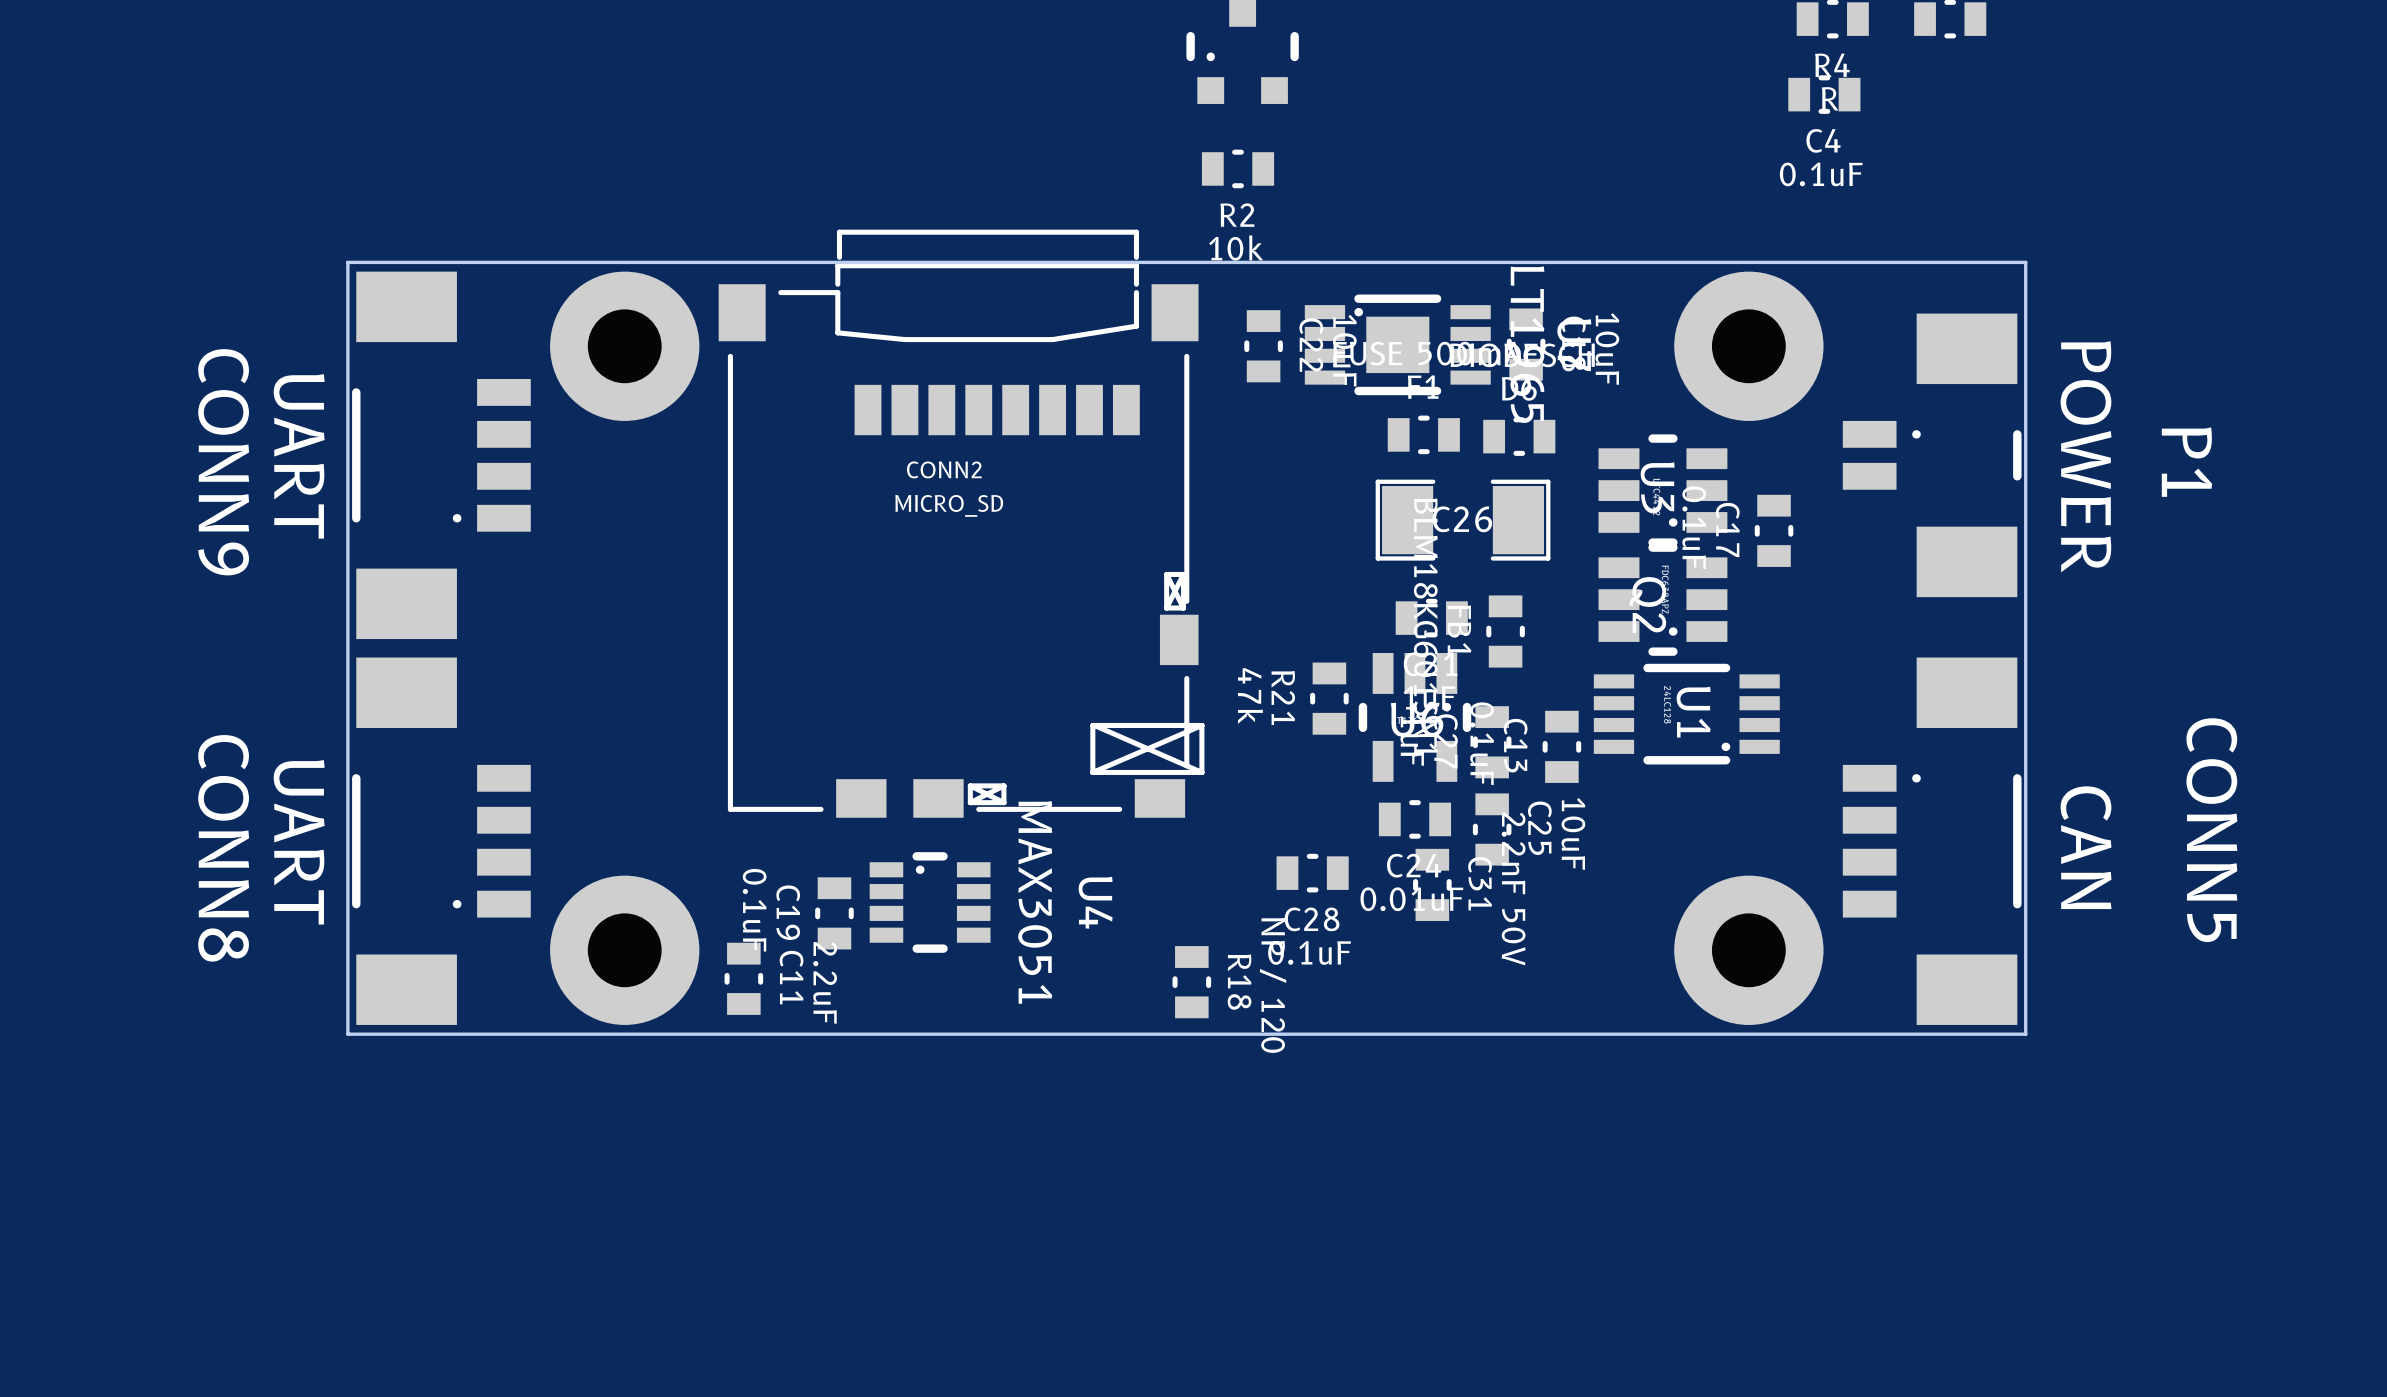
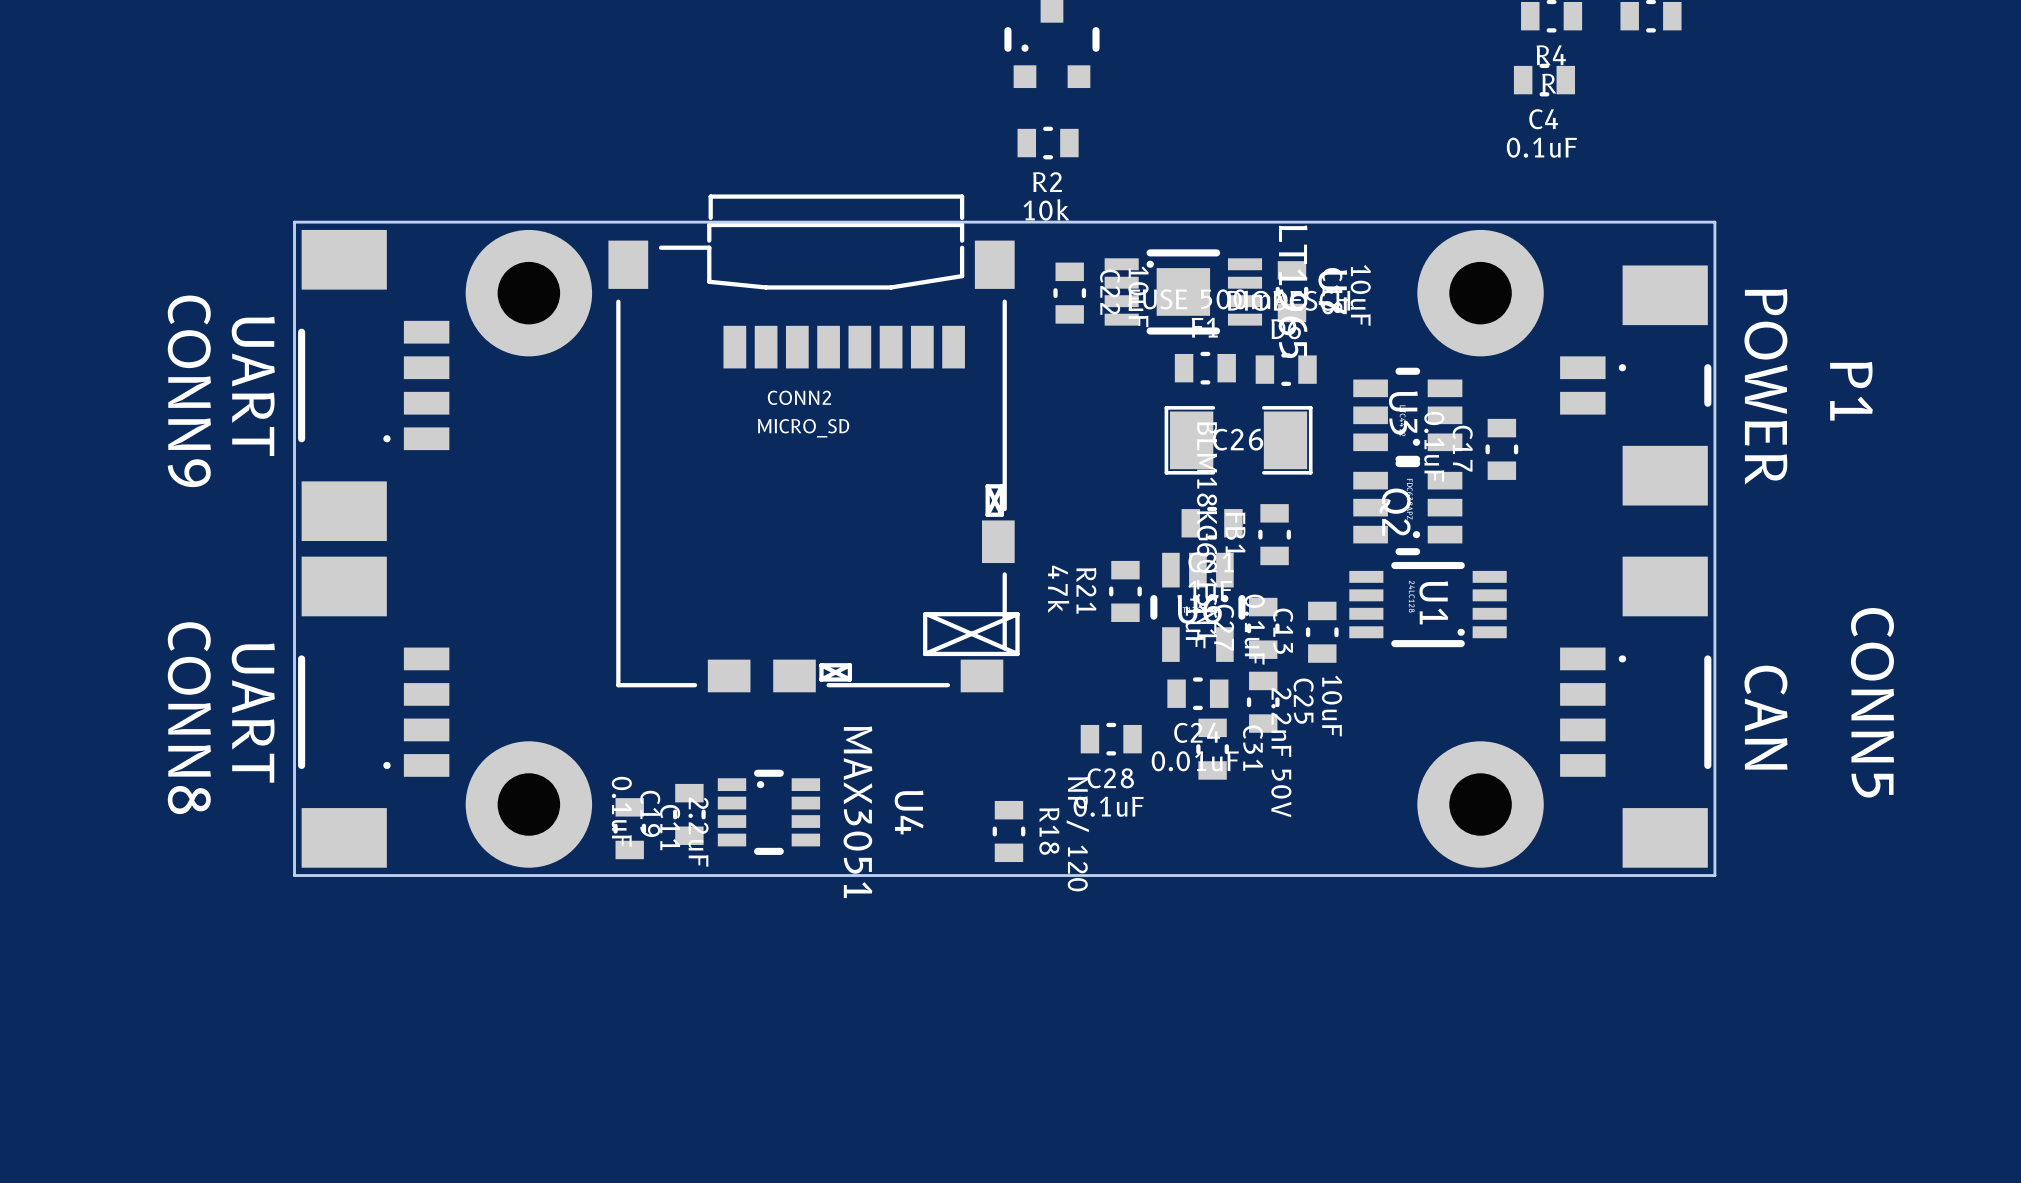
U4 position: (930, 902) -> (768, 812)
C19 position: (834, 913) -> (689, 814)

